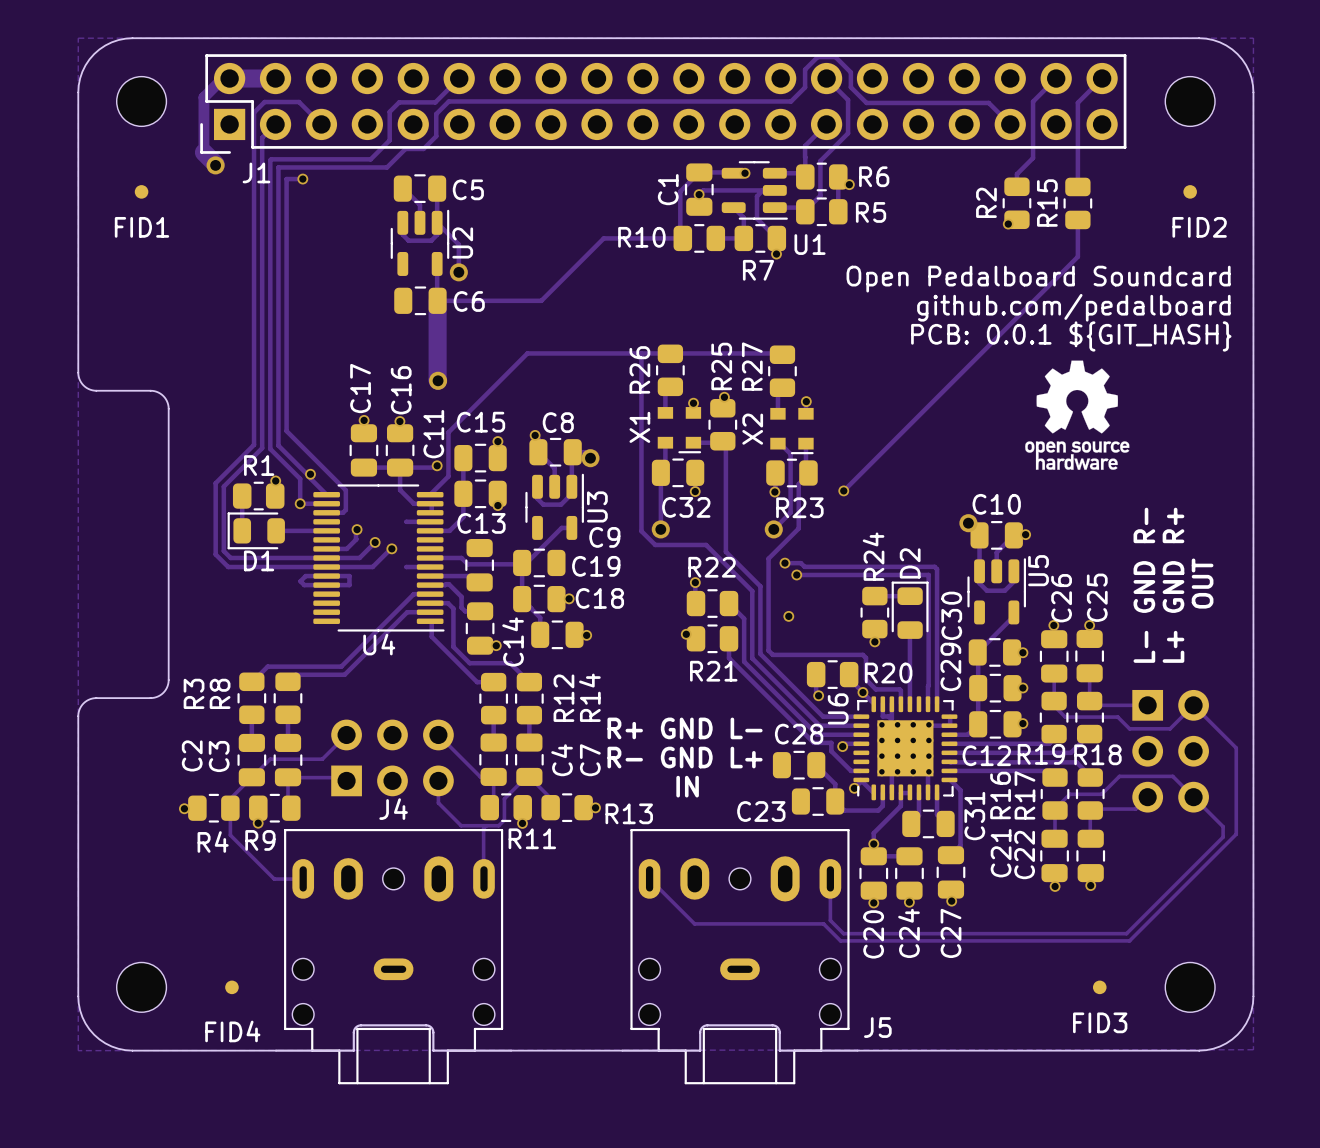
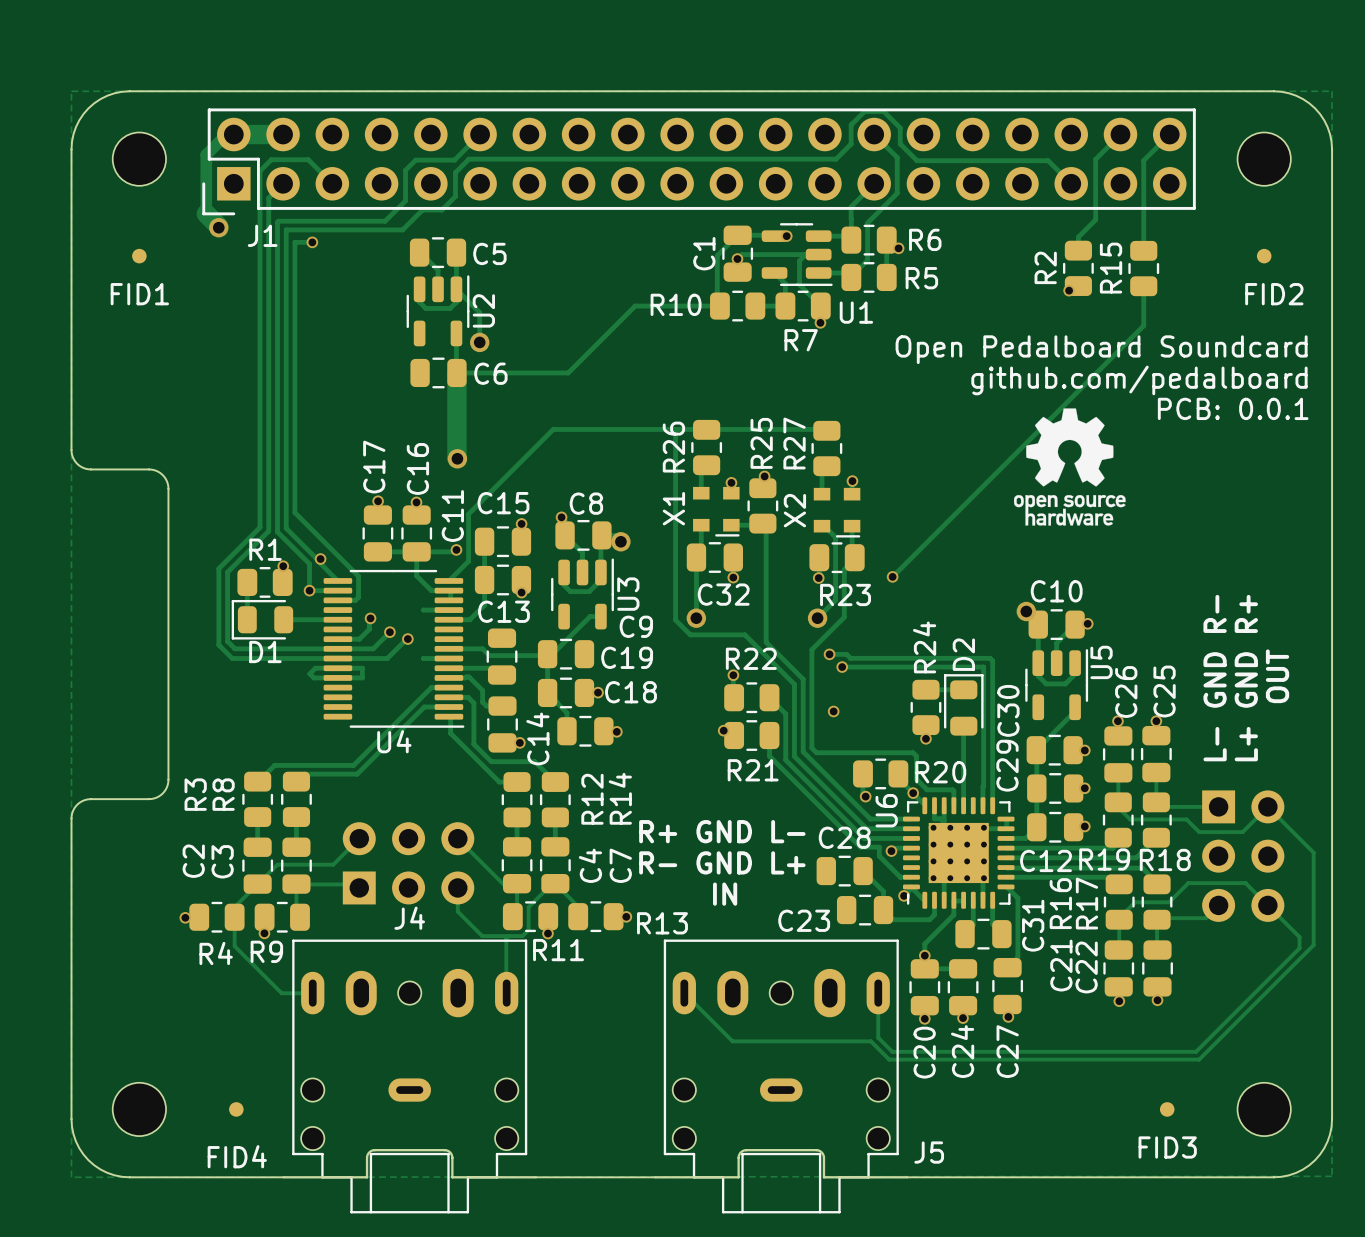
text: PCB: 0.0.1 ${GIT_HASH} (1071, 336) -> PCB: 0.0.1 (1233, 408)
drawing position: (1077, 415) -> (1069, 467)

